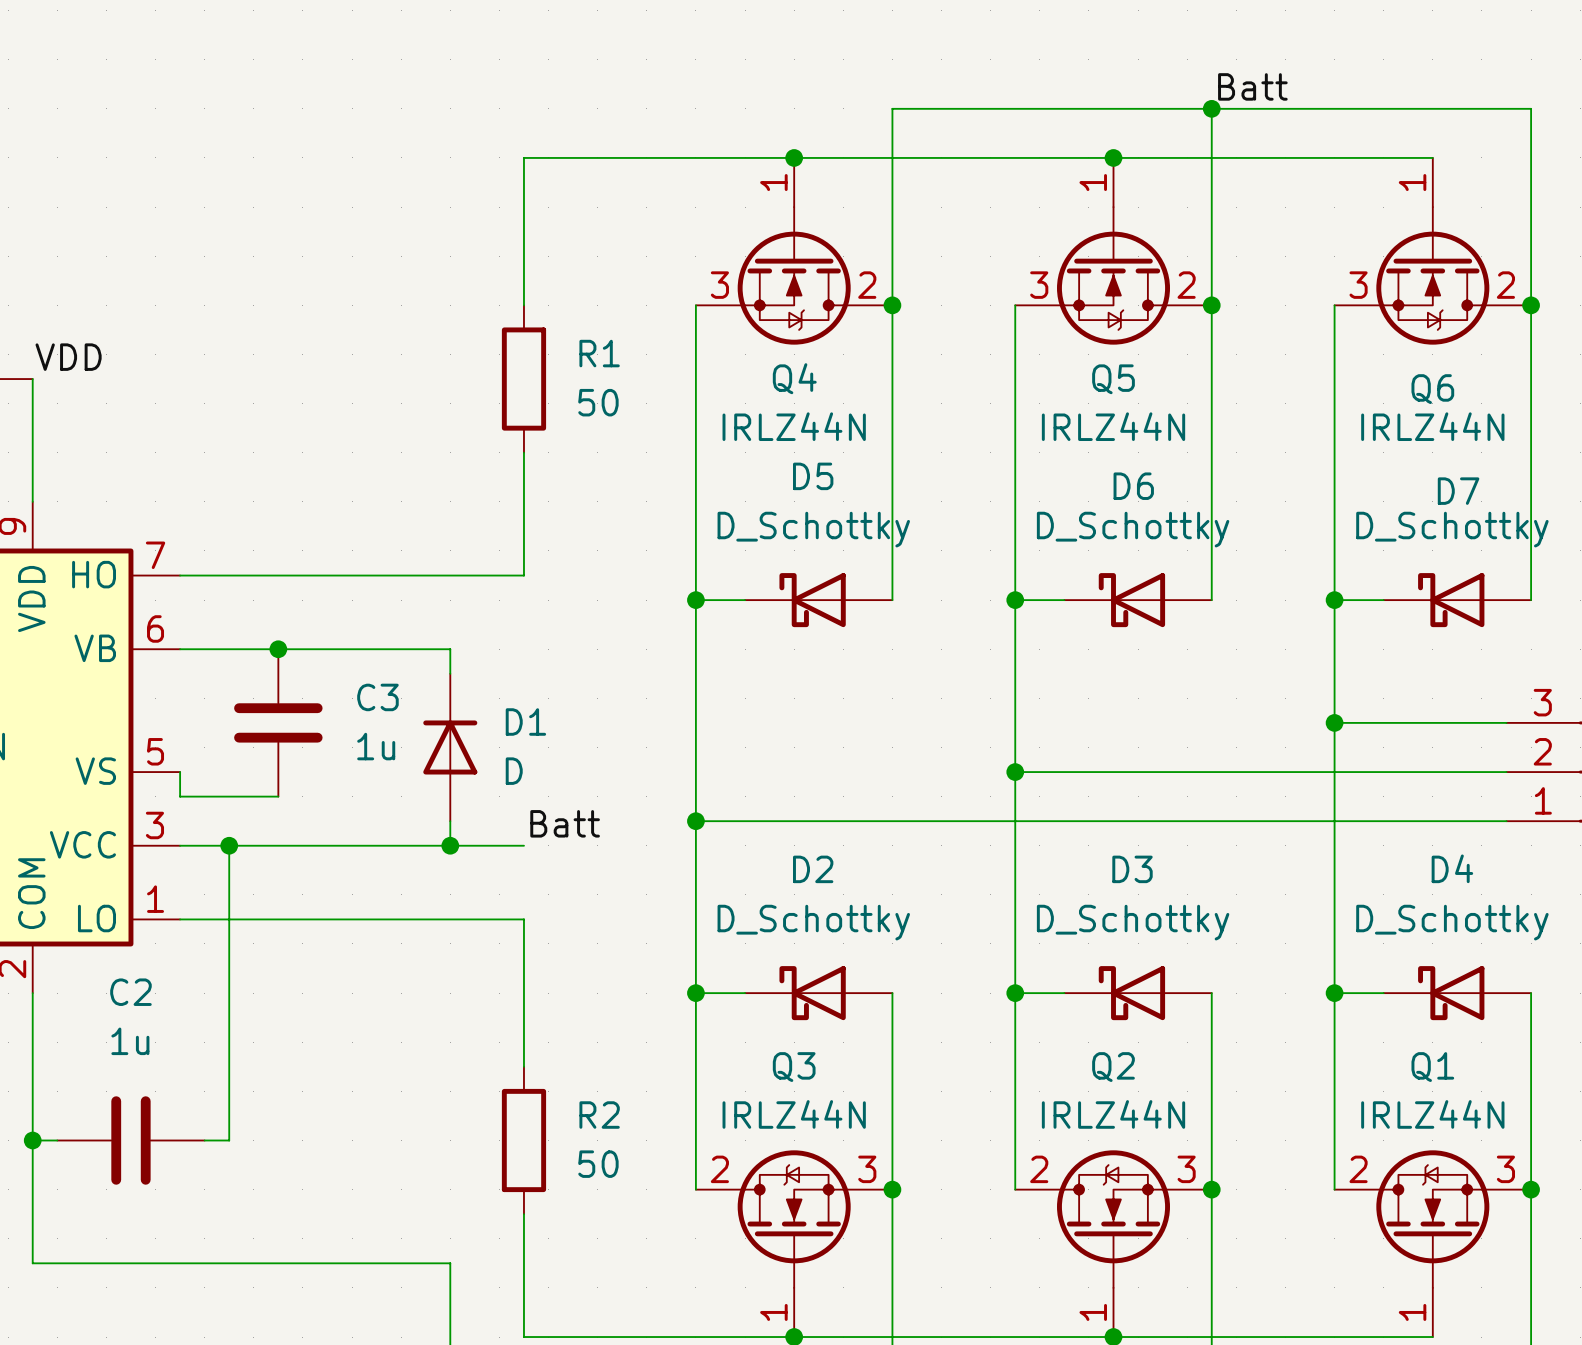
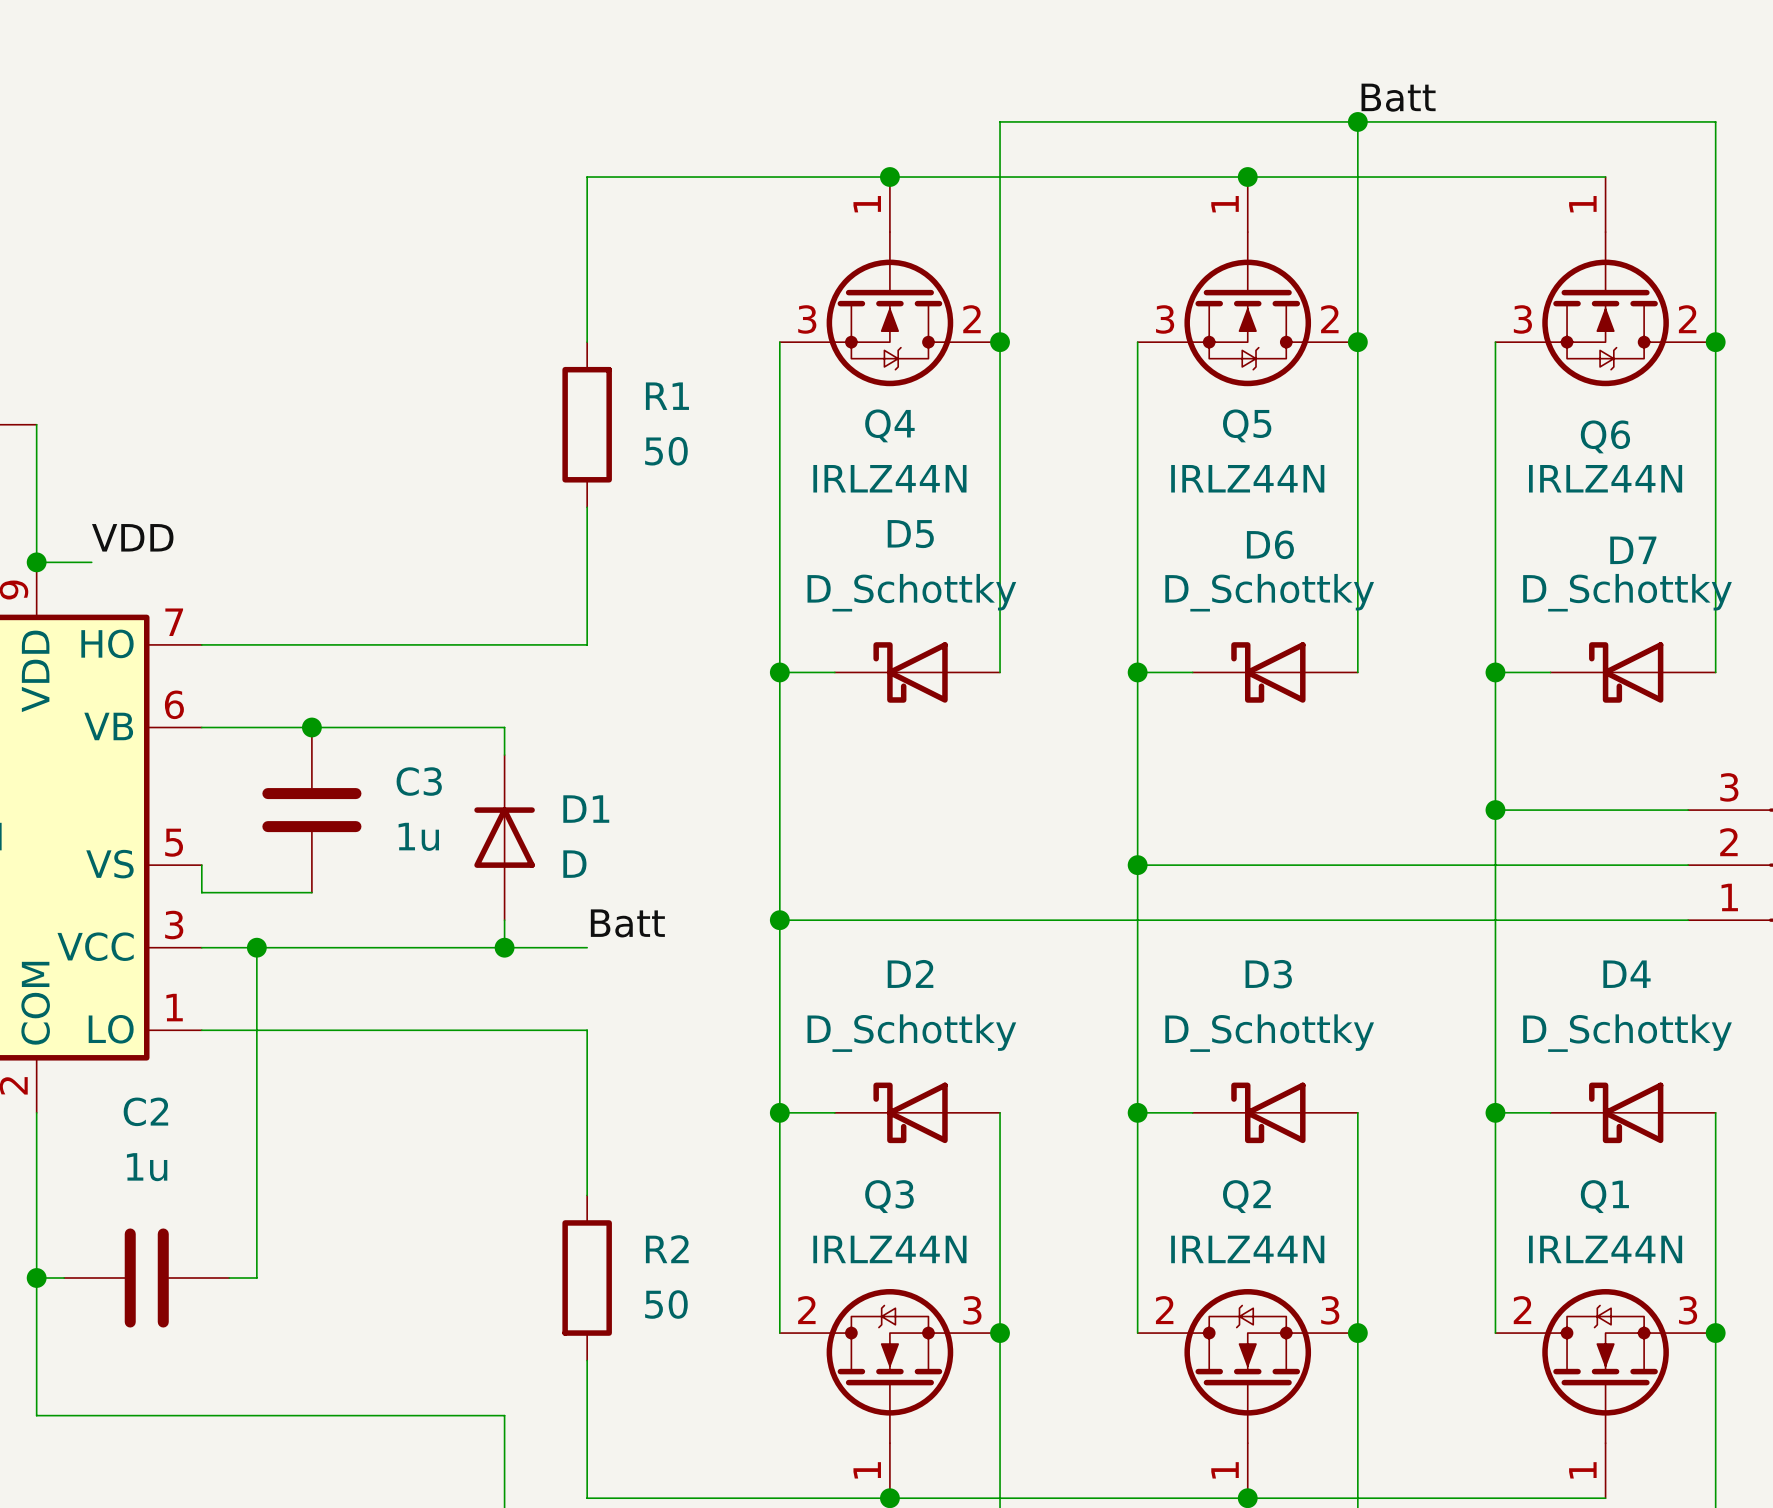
label position: VDD (68, 357) -> VDD (132, 537)
wire: none -> (36, 562) (91, 562)
junction: none -> (36, 562)

